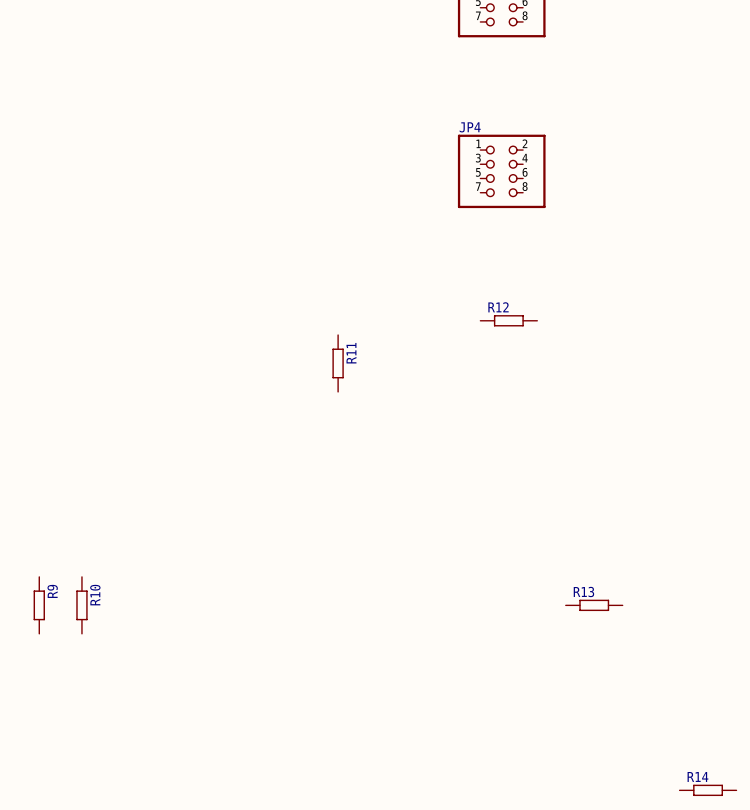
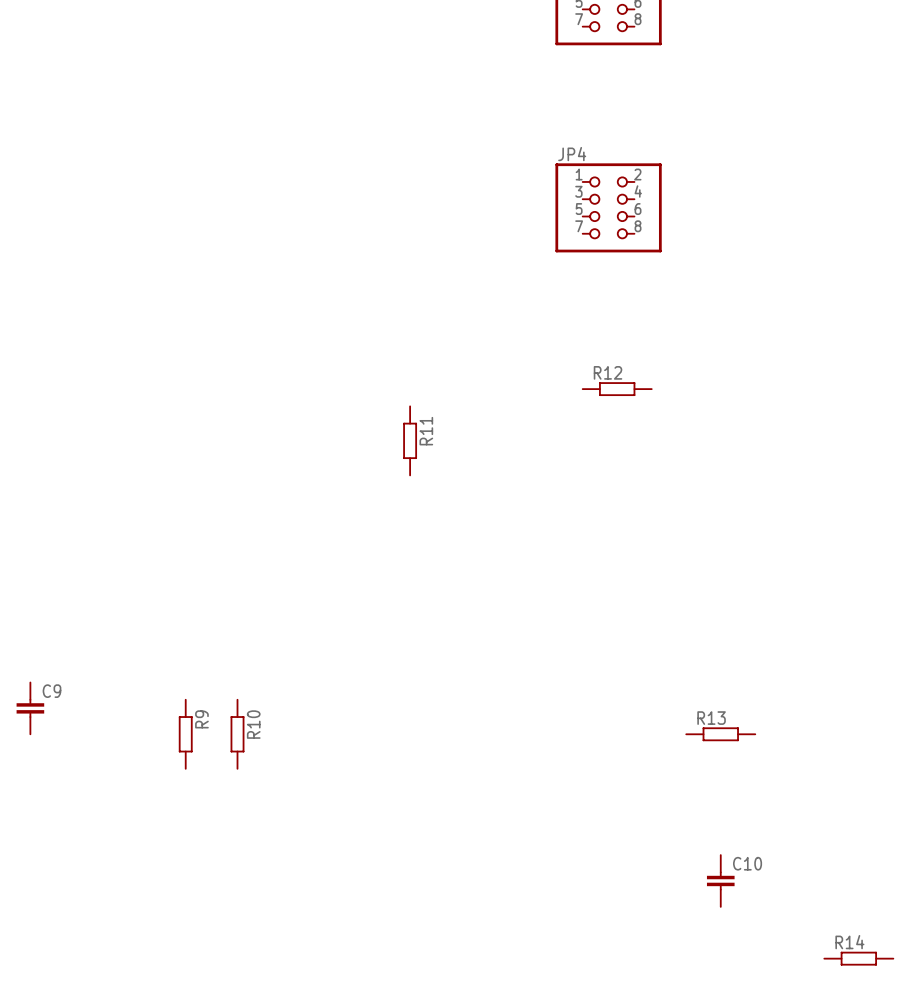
C9: none -> (30, 708)
R9 position: (39, 605) -> (185, 734)
R10 position: (81, 605) -> (237, 734)
C10: none -> (720, 880)

